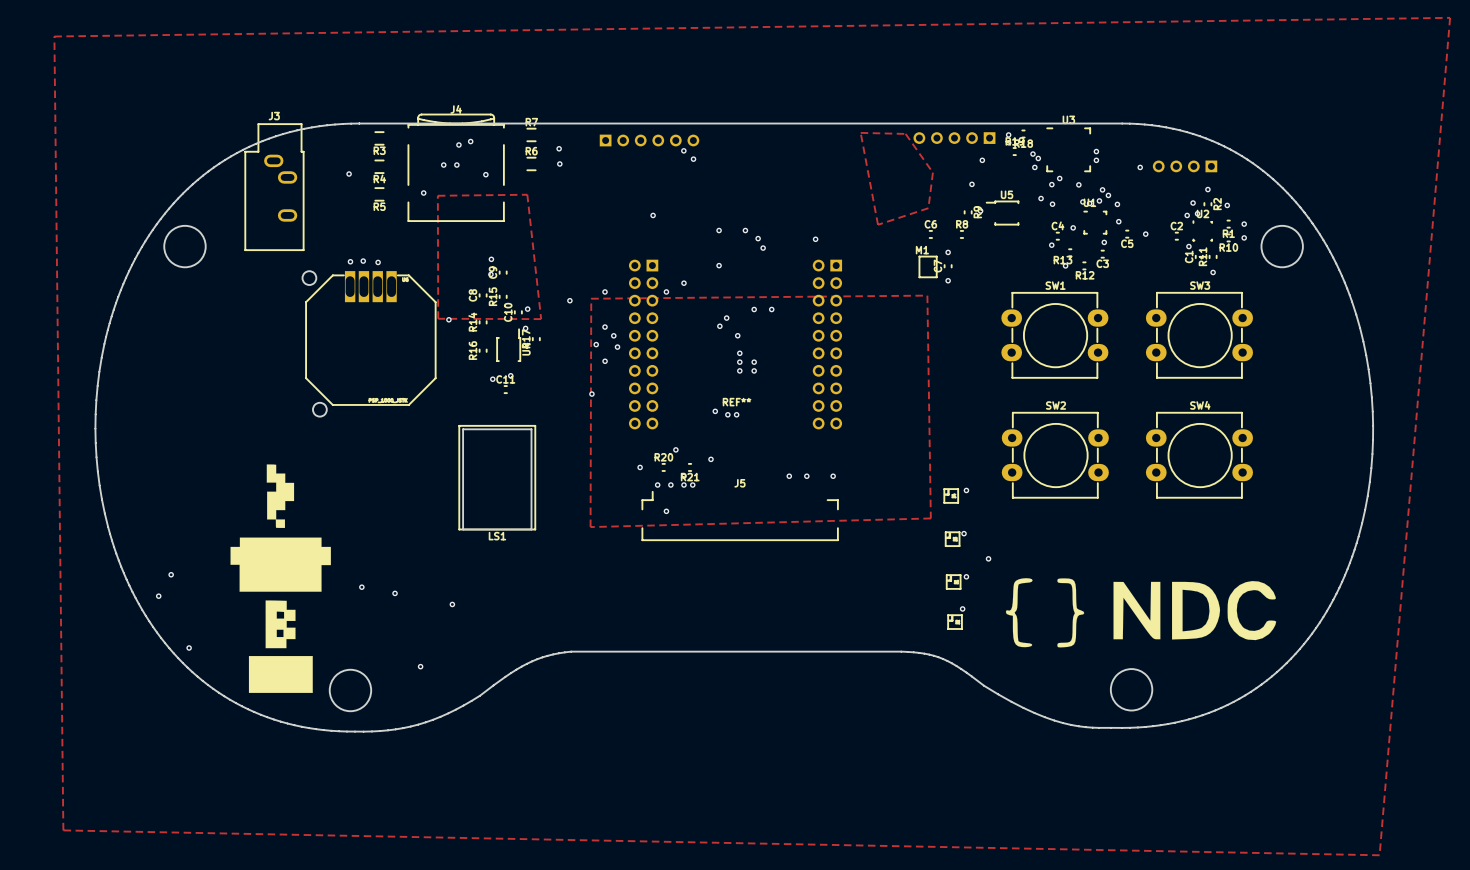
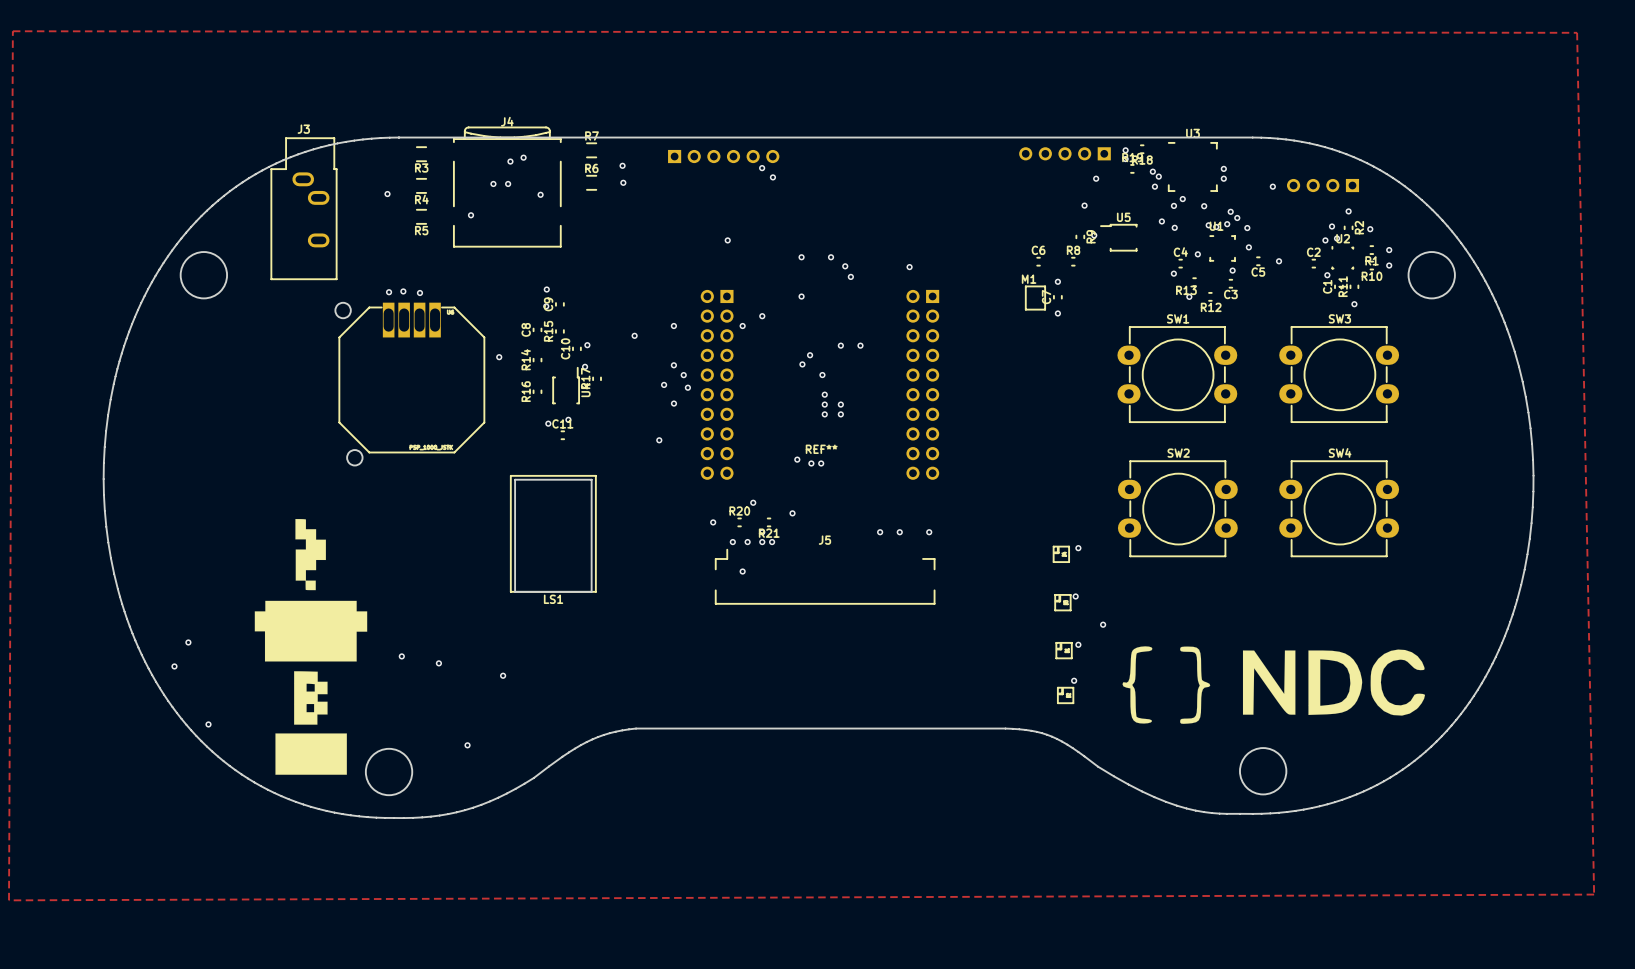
zone outline: (1450, 17) (54, 36) (63, 830) (1379, 855) (1450, 17) -> (12, 31) (9, 900) (1594, 894) (1577, 32) (12, 31)
zone outline: (860, 132) (905, 133) (932, 172) (928, 208) (877, 224) (860, 132) -> none
zone outline: (527, 194) (437, 195) (438, 318) (541, 319) (527, 194) -> none
zone outline: (927, 295) (591, 298) (590, 527) (930, 518) (927, 295) -> none

